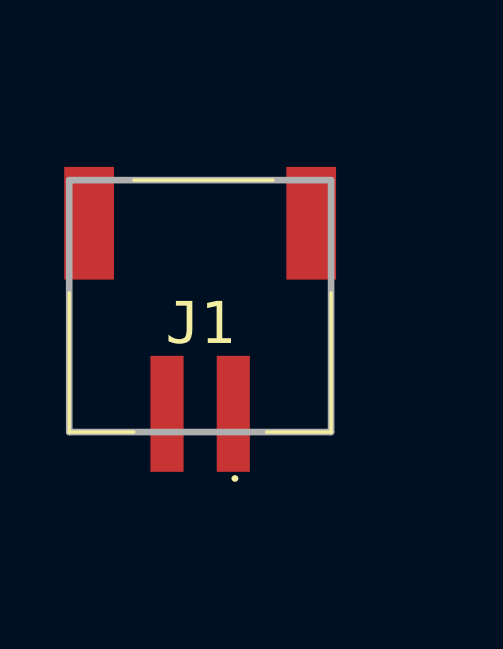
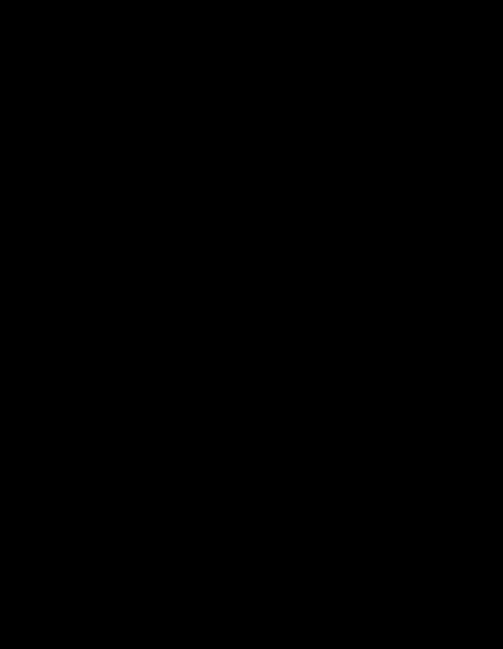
J1: (200, 324) -> none

